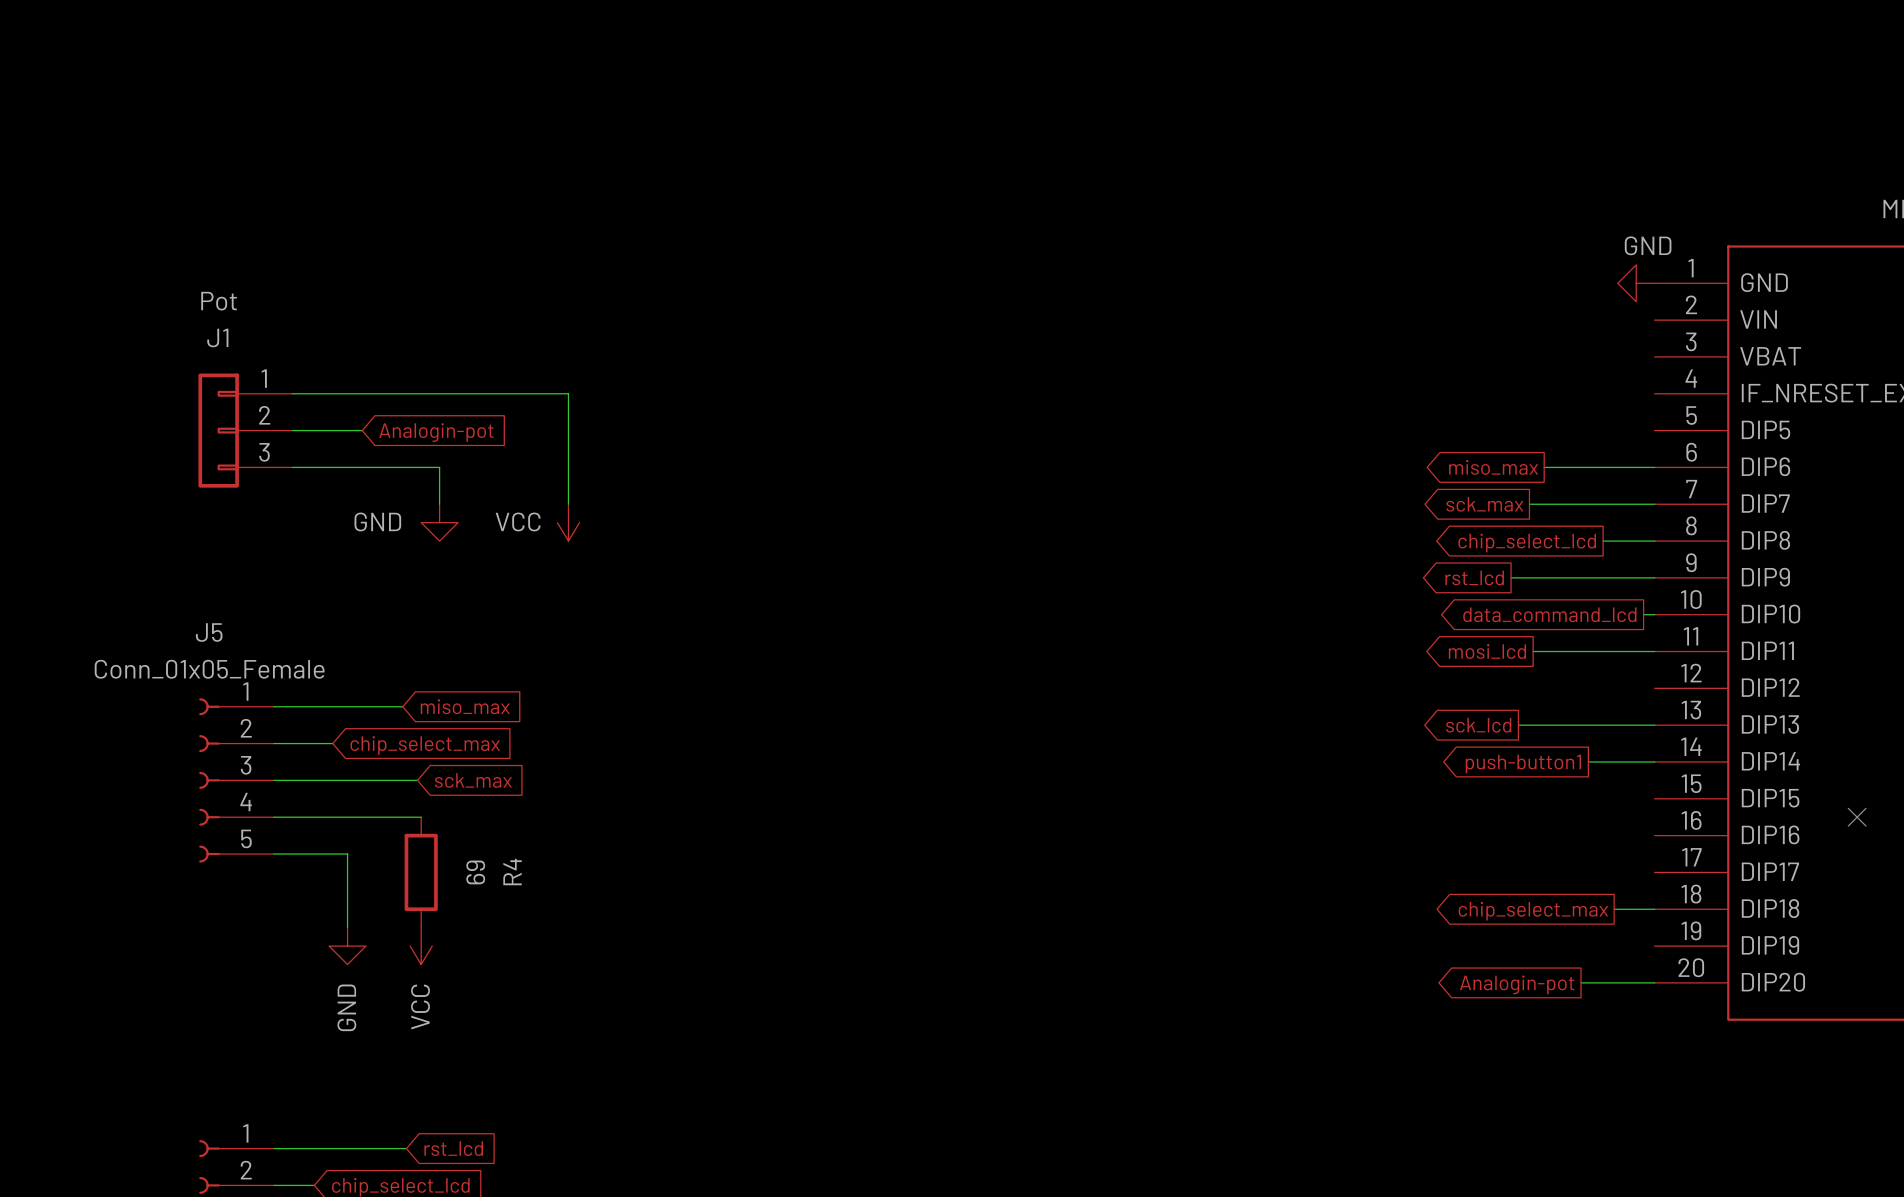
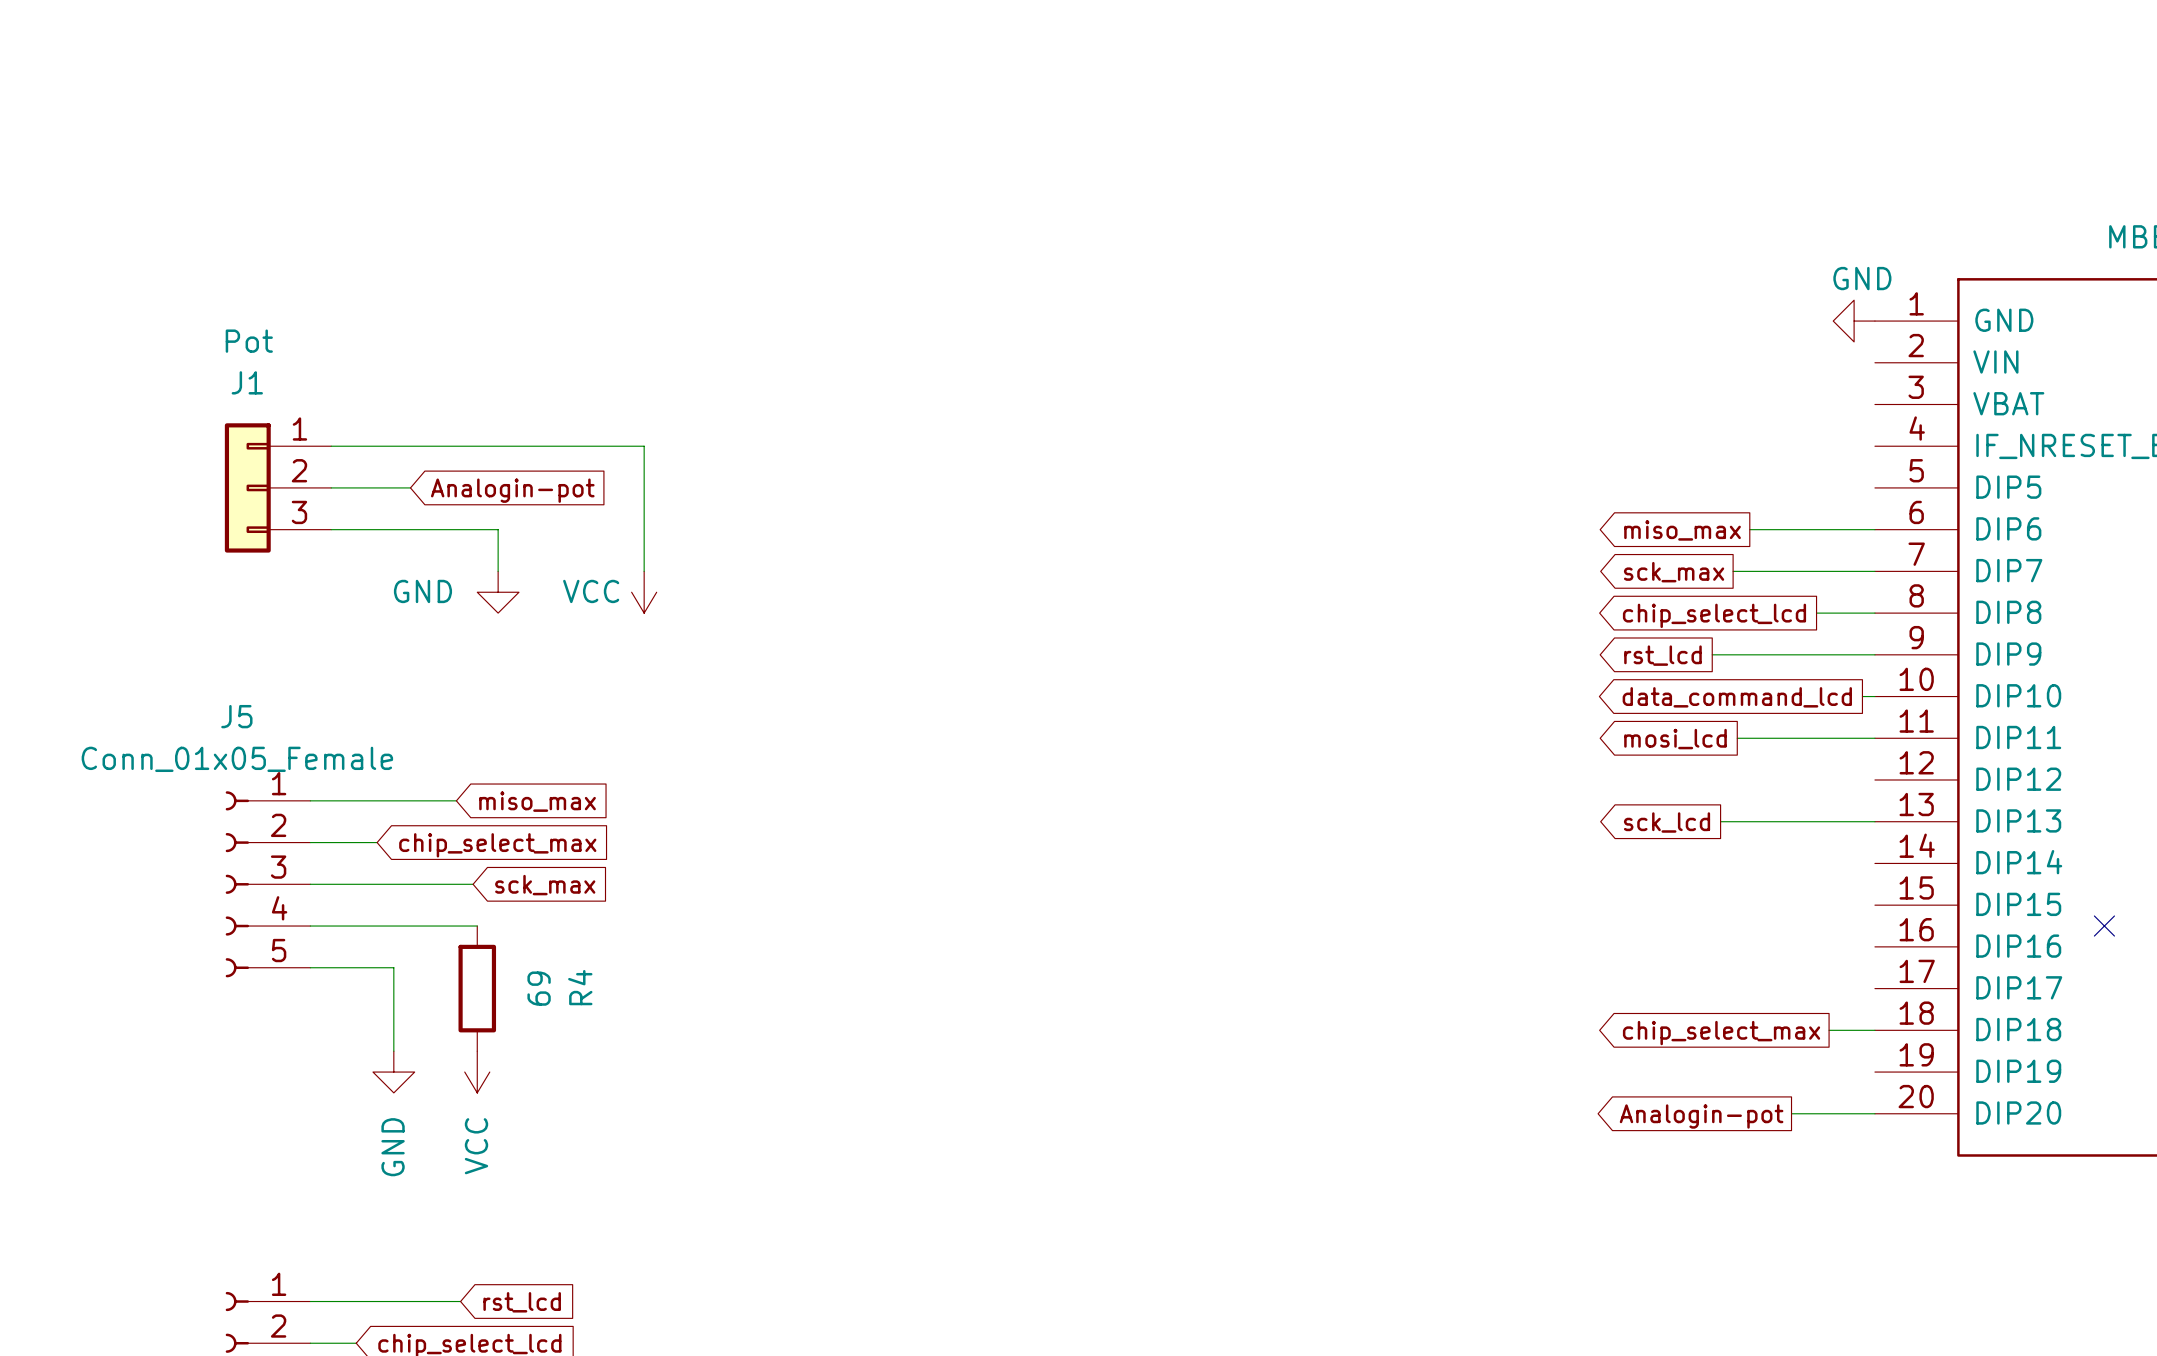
wire: (1588, 761) (1654, 761) -> none
global label: push-button1 (1523, 763) -> none

